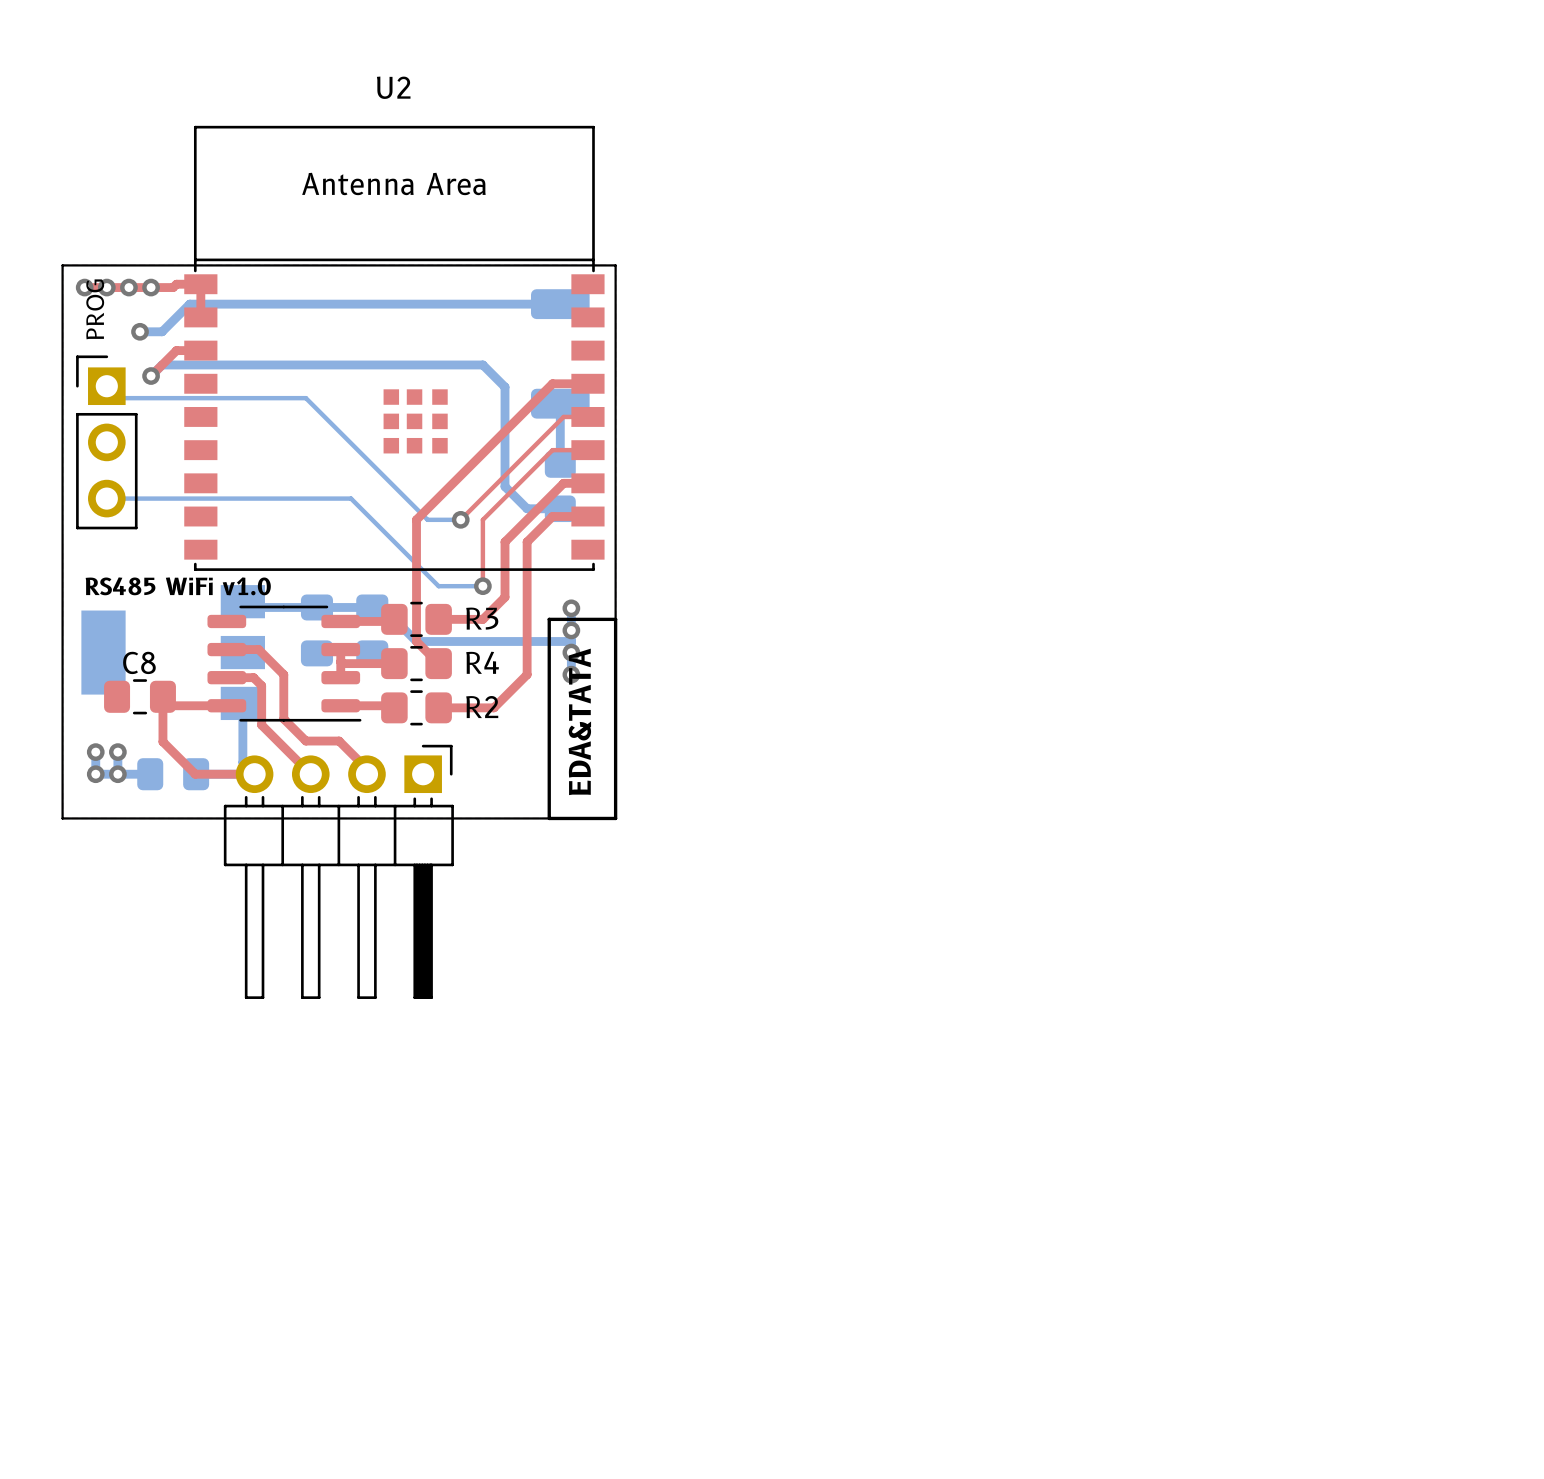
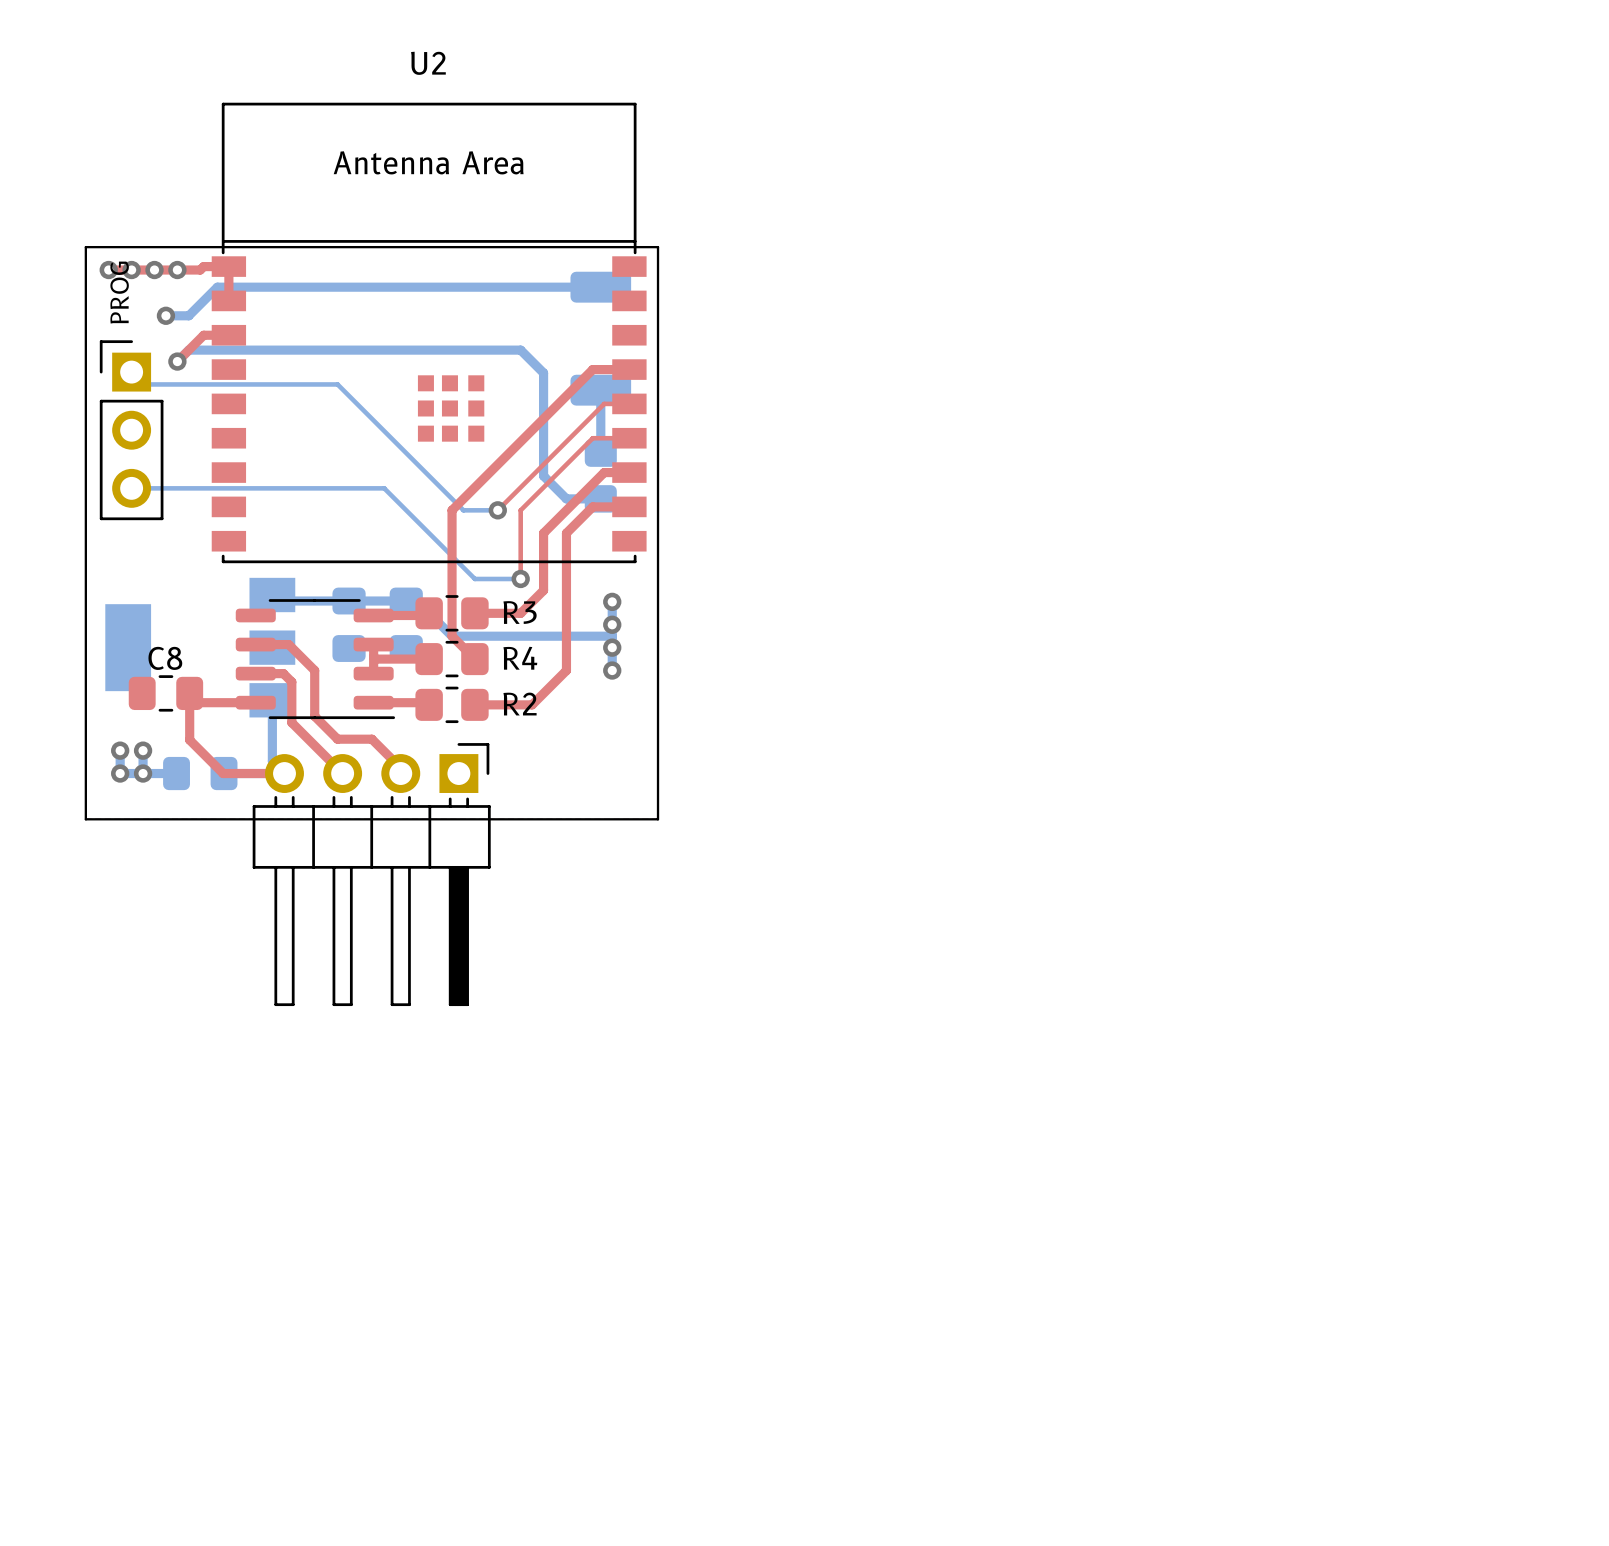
text: RS485 WiFi v1.0 (178, 586) -> none
line: (549, 619) (549, 818) (615, 818) (615, 619) (549, 619) -> none
text: EDA&TATA (579, 721) -> none

